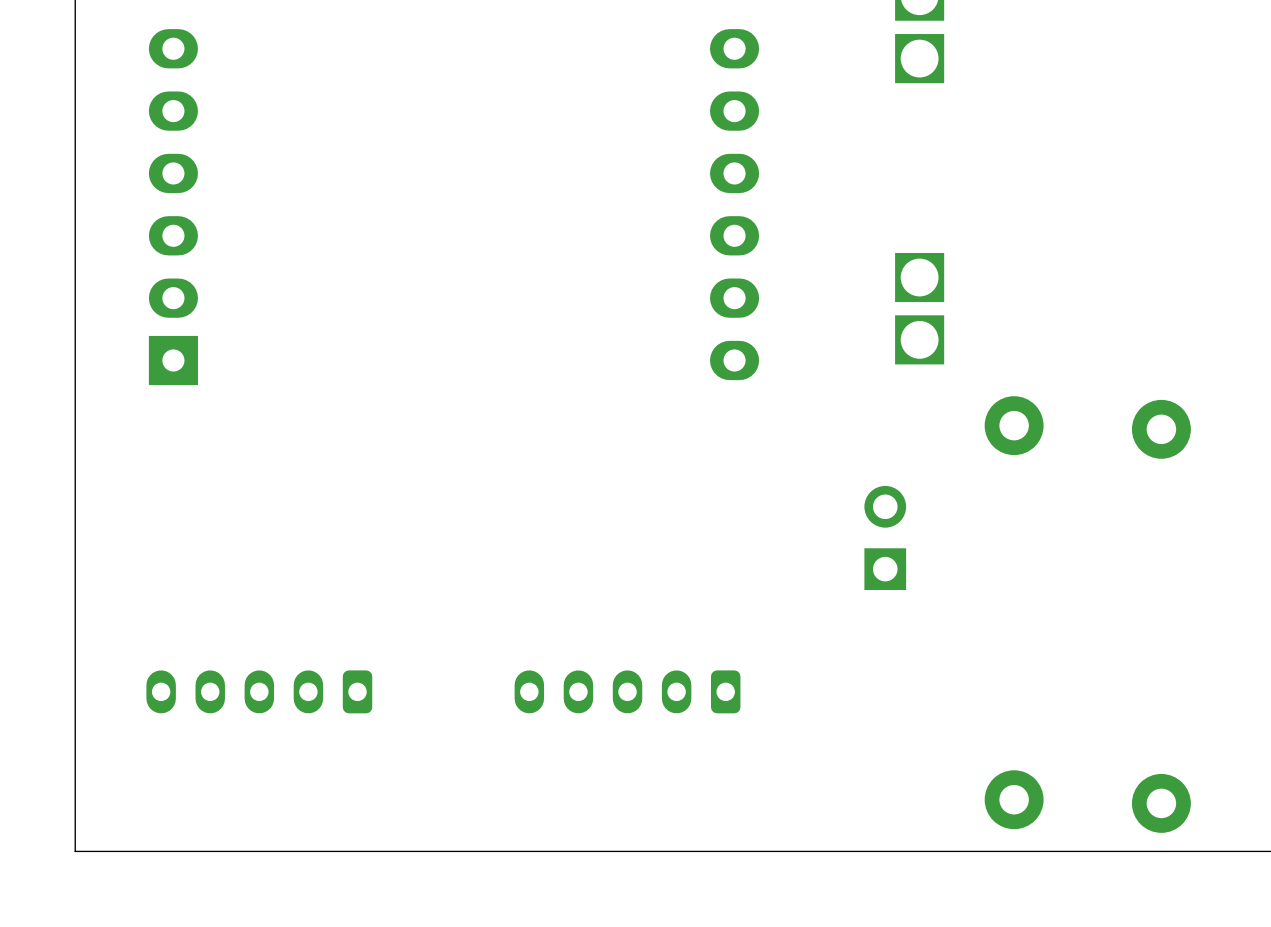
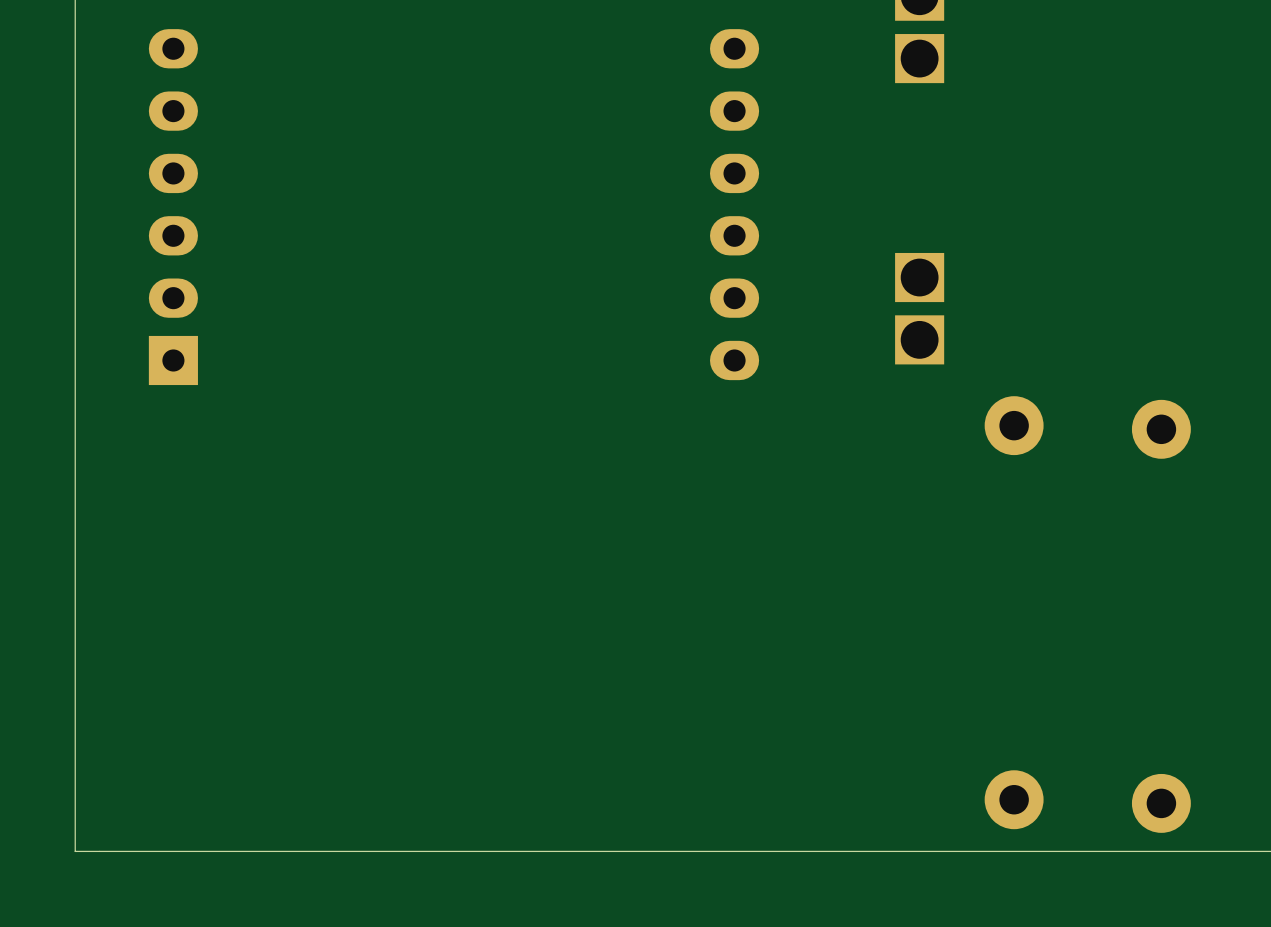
part: (885, 537) -> none
part: (259, 691) -> none
part: (627, 691) -> none

